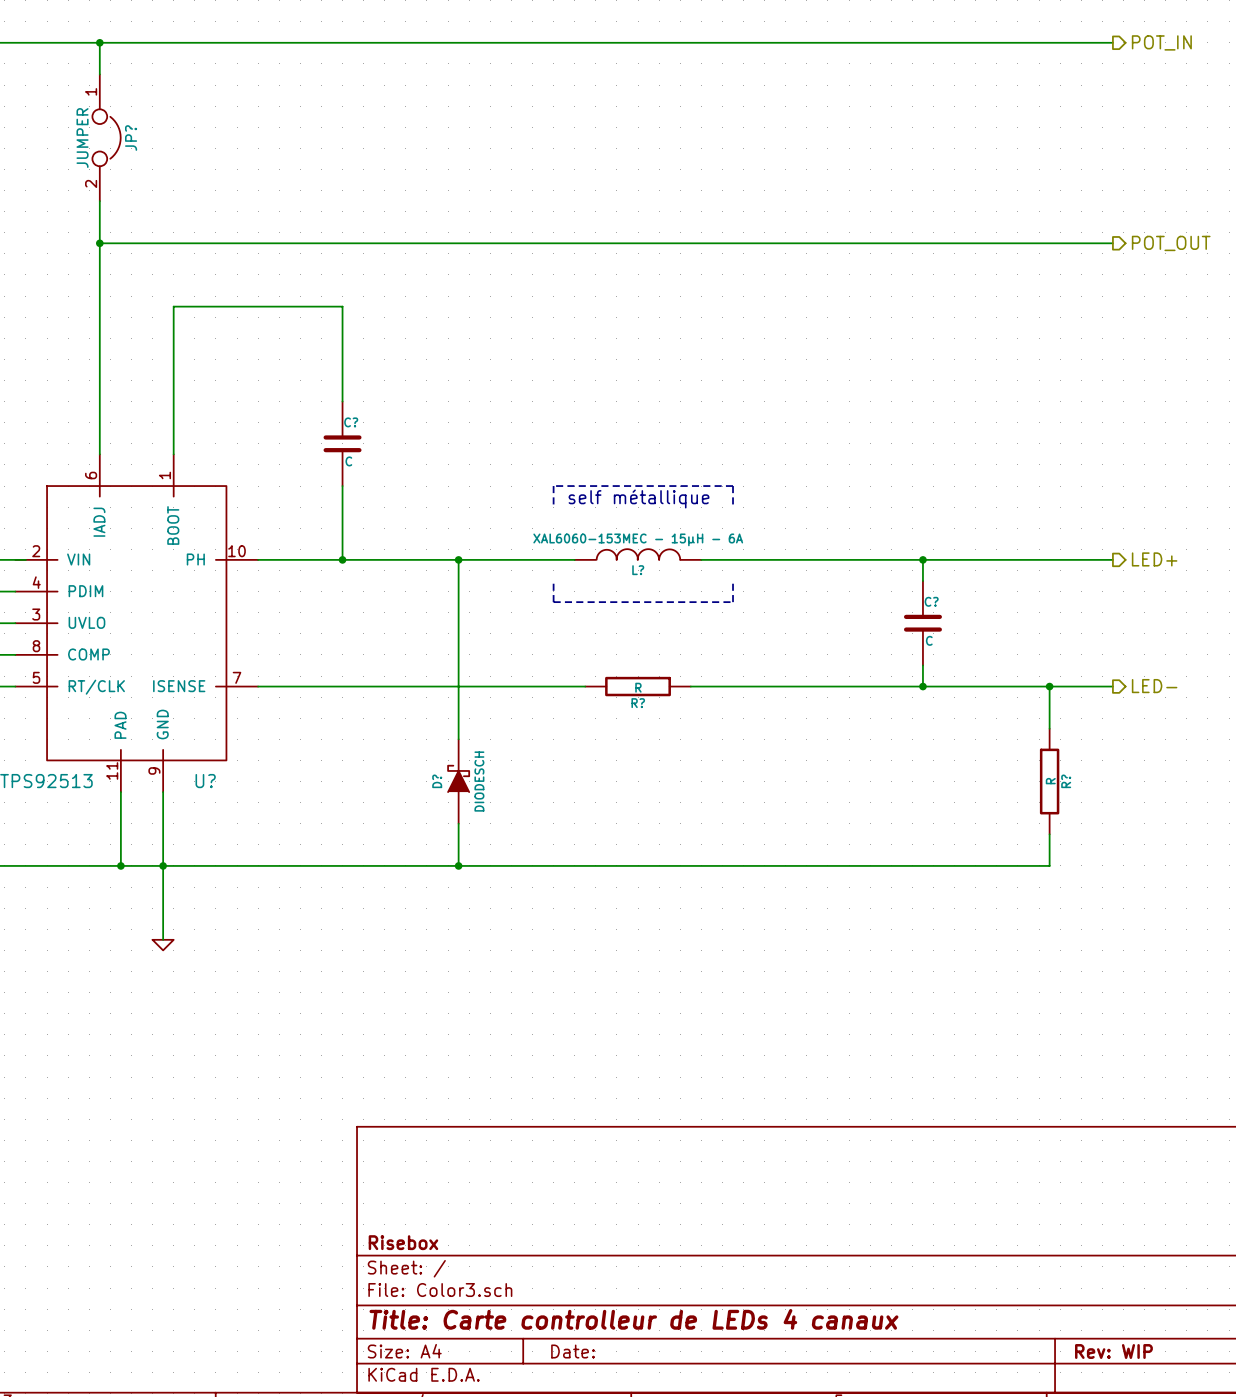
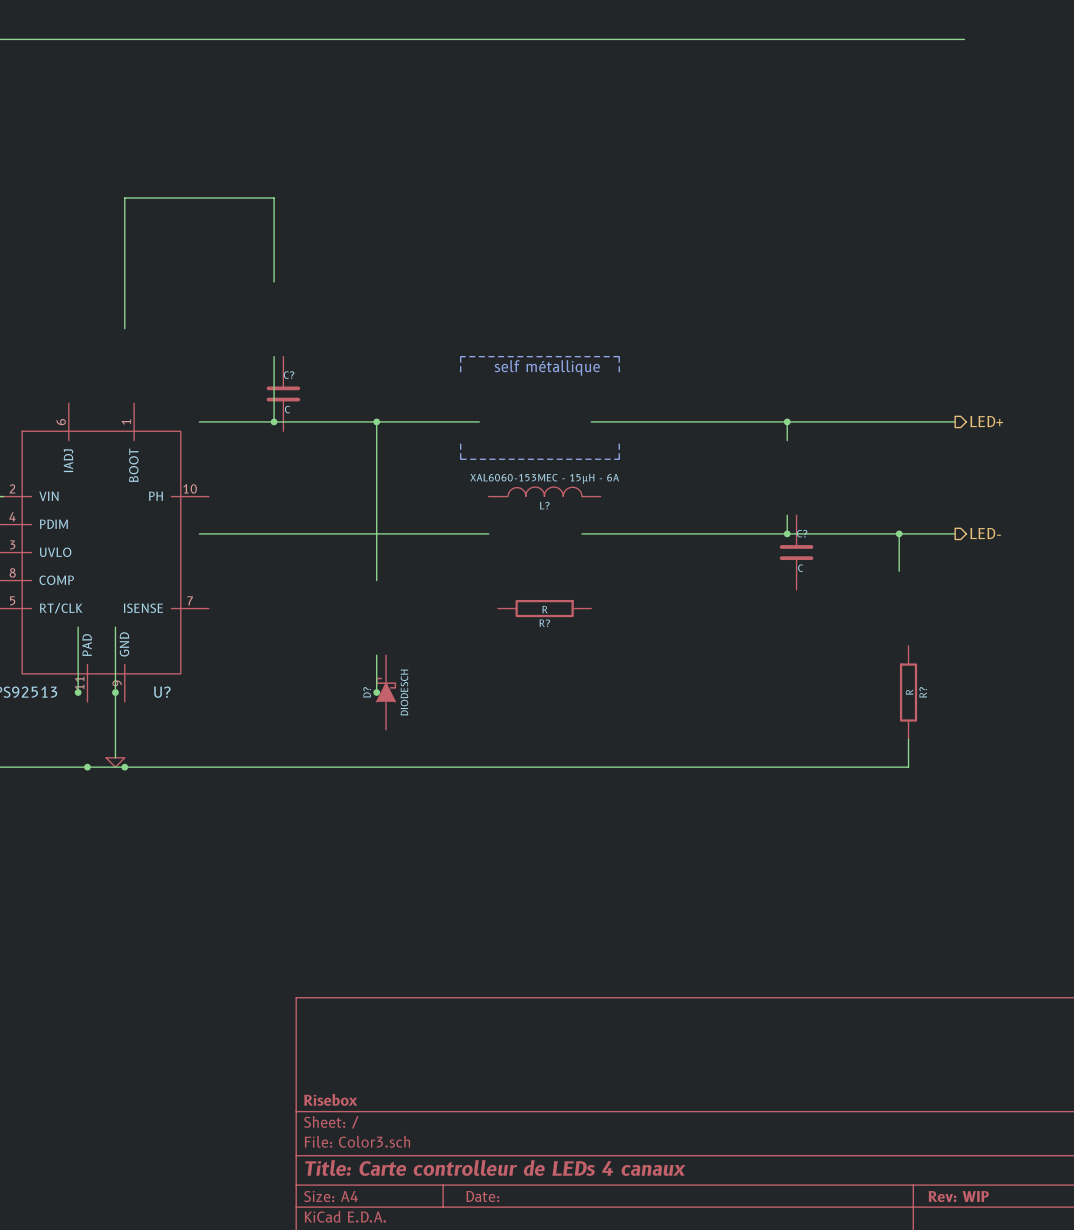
wire: (99, 42) (99, 74) -> none
junction: (99, 42) -> none
hierarchical label: POT_IN (1161, 42) -> none
JP?: JUMPER (106, 137) -> none
wire: (99, 201) (99, 454) -> none
wire: (99, 243) (1112, 243) -> none
junction: (99, 243) -> none
hierarchical label: POT_OUT (1171, 243) -> none
wire: (342, 401) (342, 306) (173, 306) (173, 454) -> (274, 281) (274, 198) (124, 198) (124, 328)
junction: none -> (274, 421)
junction: none -> (376, 421)
junction: none -> (787, 421)
wire: (342, 486) (342, 559) -> (274, 356) (274, 421)
text position: self métallique (639, 498) -> self métallique (547, 367)
line: (553, 507) (553, 486) (733, 486) (733, 507) -> (460, 375) (460, 356) (619, 356) (619, 375)
wire: (258, 559) (574, 559) -> (199, 421) (479, 421)
junction: (342, 559) -> none
wire: (458, 559) (458, 739) -> (376, 421) (376, 580)
junction: (458, 559) -> none
wire: (701, 559) (1112, 559) -> (591, 421) (955, 421)
wire: (922, 559) (922, 581) -> (787, 421) (787, 440)
junction: (922, 559) -> none
hierarchical label position: LED+ (1154, 559) -> LED+ (986, 421)
line: (553, 581) (553, 602) (733, 602) (733, 581) -> (460, 440) (460, 459) (619, 459) (619, 440)
junction: none -> (787, 533)
junction: none -> (899, 533)
wire: (922, 665) (922, 686) -> (787, 515) (787, 533)
wire: (258, 686) (585, 686) -> (199, 533) (488, 533)
wire: (690, 686) (1112, 686) -> (581, 533) (955, 533)
junction: (922, 686) -> none
wire: (1049, 686) (1049, 728) -> (899, 533) (899, 571)
junction: (1049, 686) -> none
hierarchical label position: LED- (1154, 686) -> LED- (985, 533)
junction: none -> (78, 692)
junction: none -> (115, 692)
junction: none -> (376, 692)
wire: (120, 792) (120, 865) -> (78, 627) (78, 692)
wire: (163, 792) (163, 939) -> (115, 627) (115, 757)
wire: (458, 823) (458, 865) -> (376, 655) (376, 692)
junction: (458, 865) -> none
power symbol position: (163, 945) -> (115, 762)

